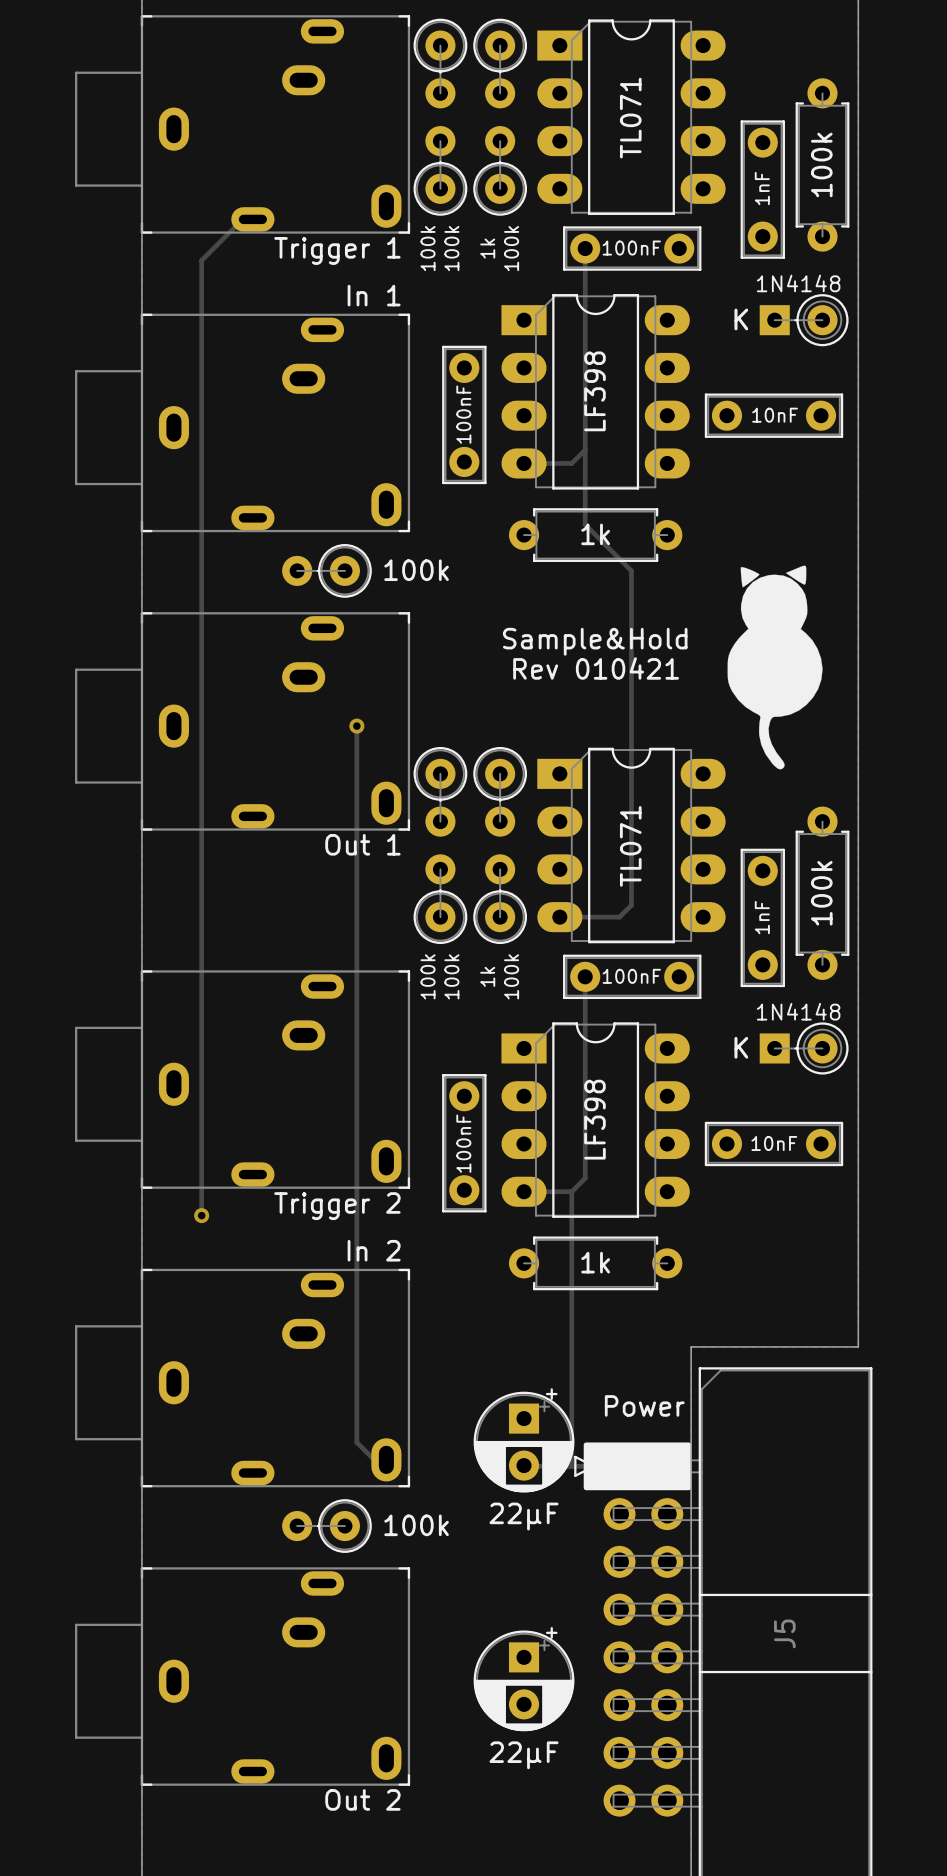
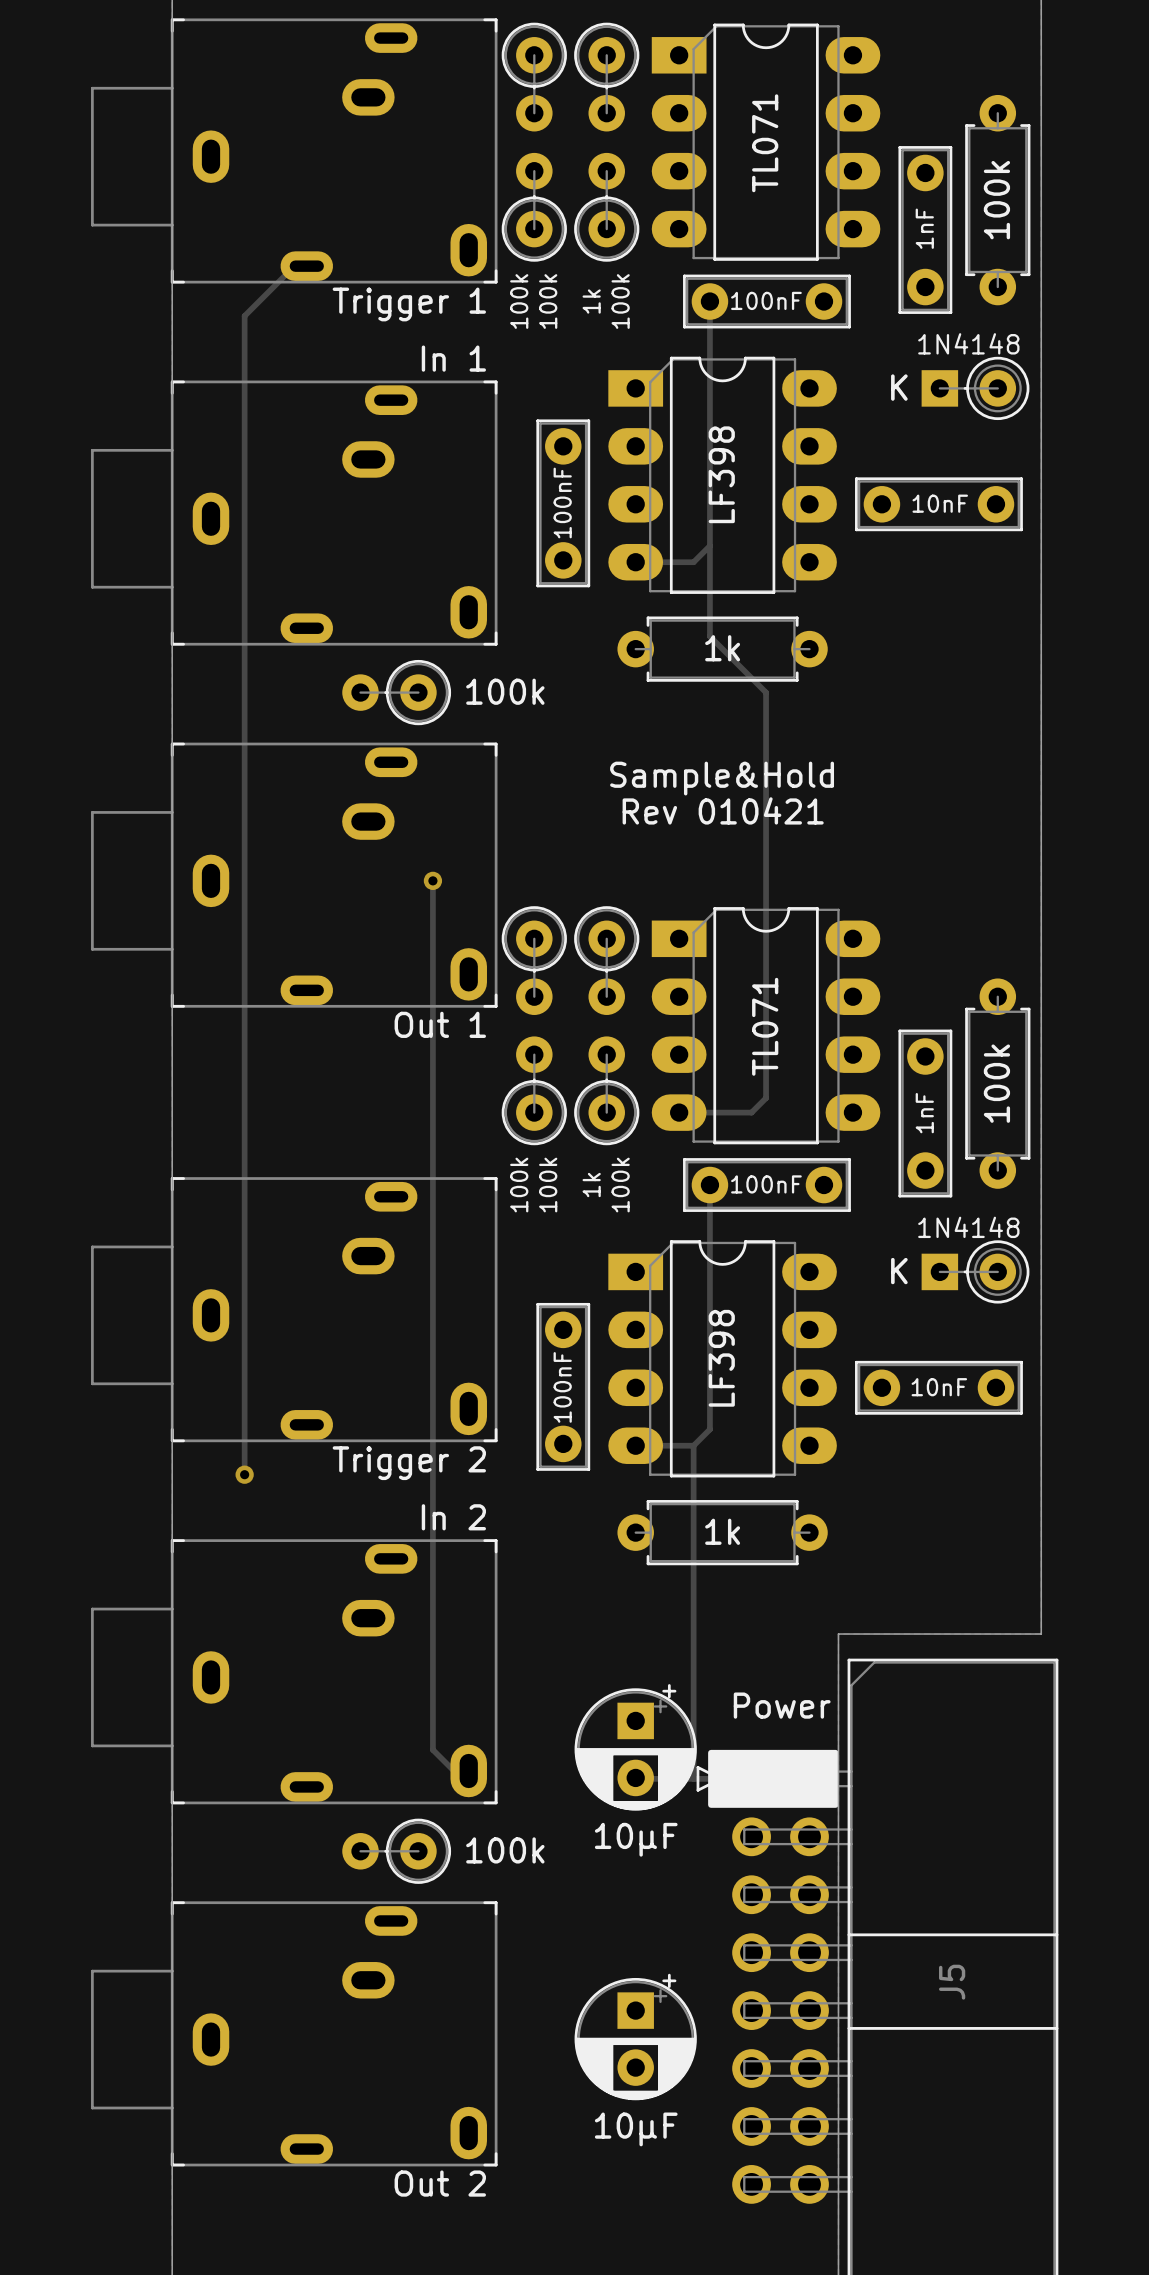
drawing: [727, 565, 823, 770] -> none
part value: 22µF (524, 1516) -> 10µF (636, 1839)
part value: 22µF (524, 1755) -> 10µF (636, 2129)

